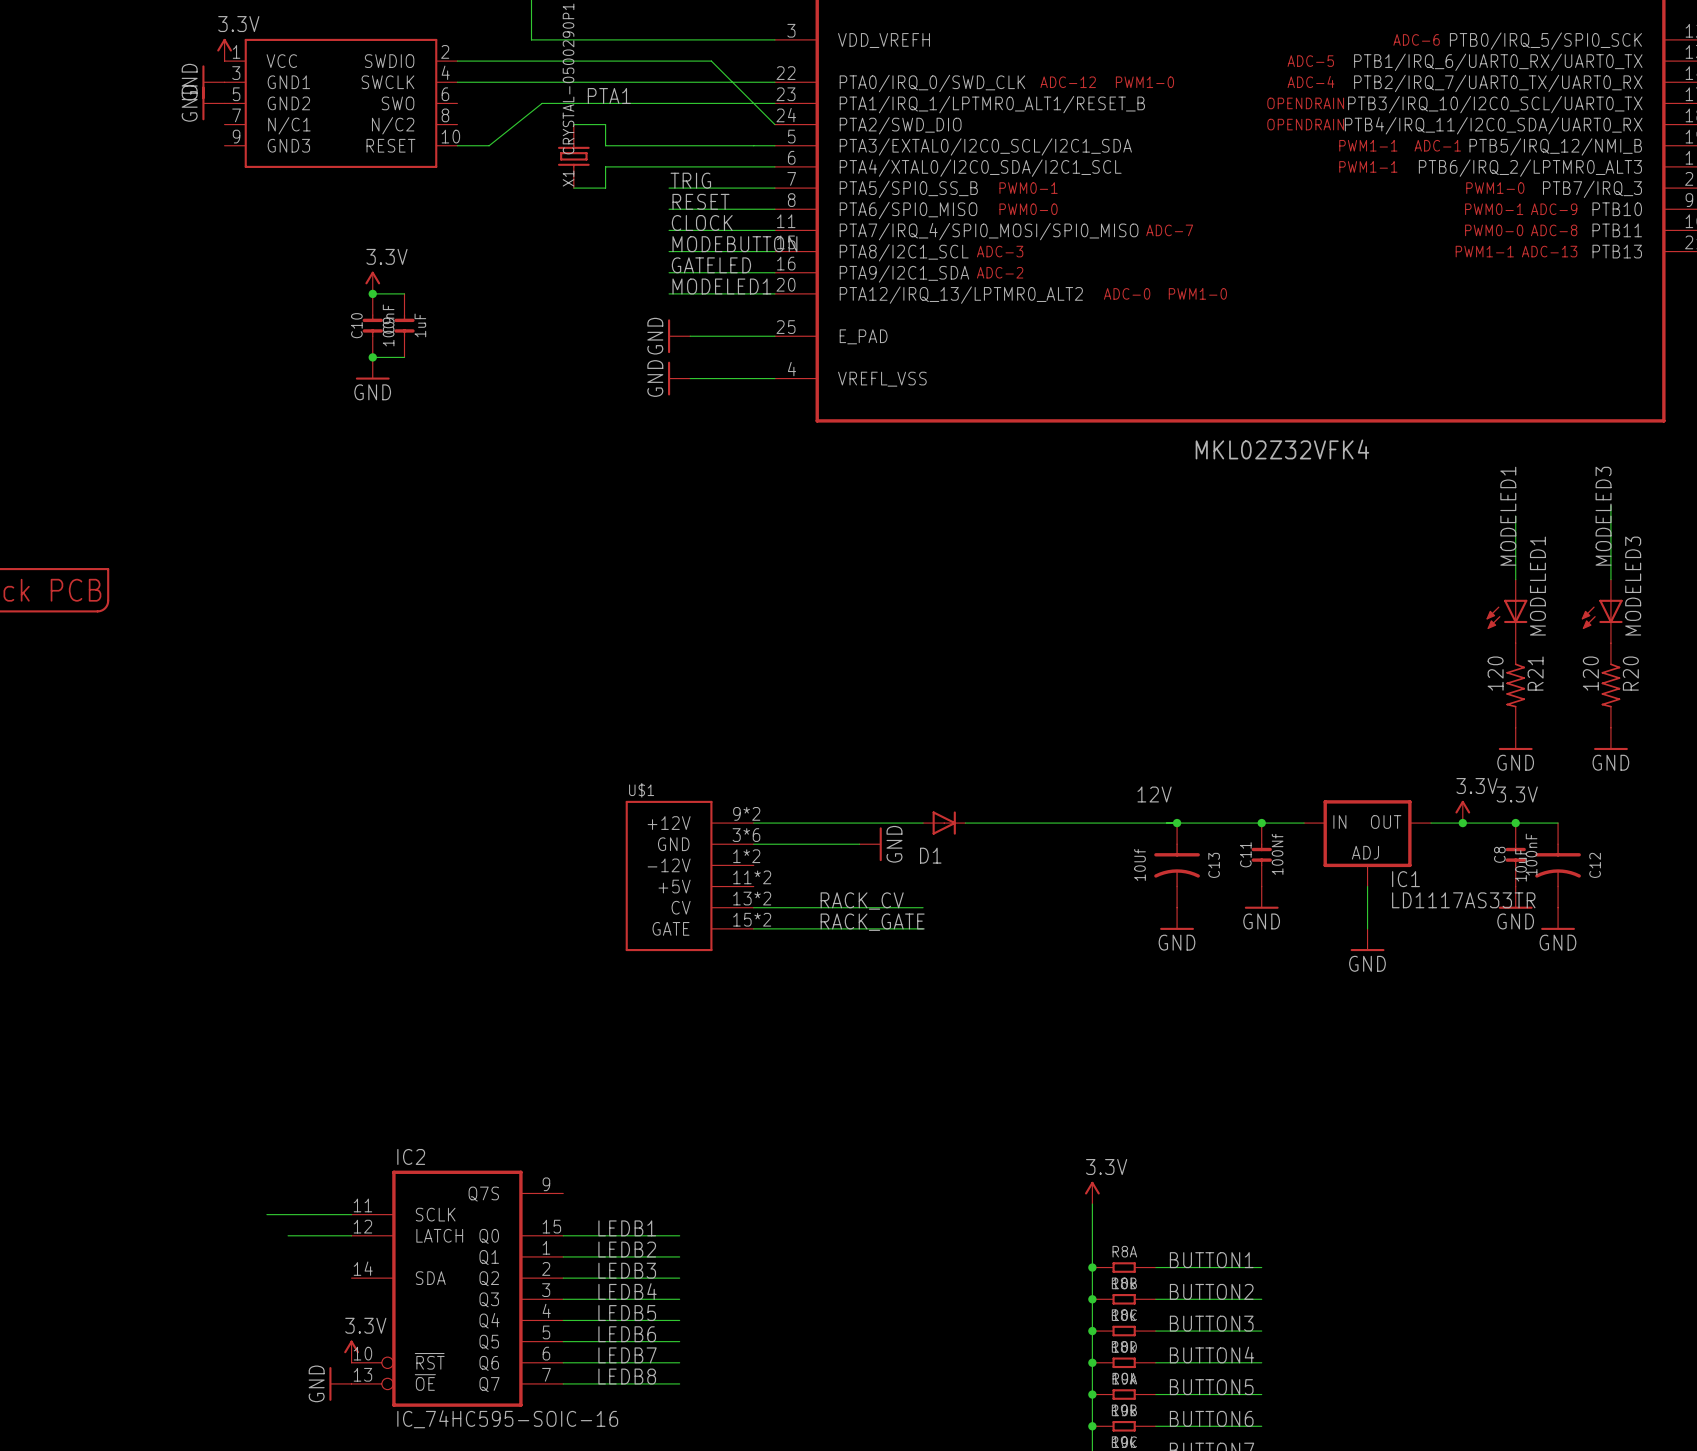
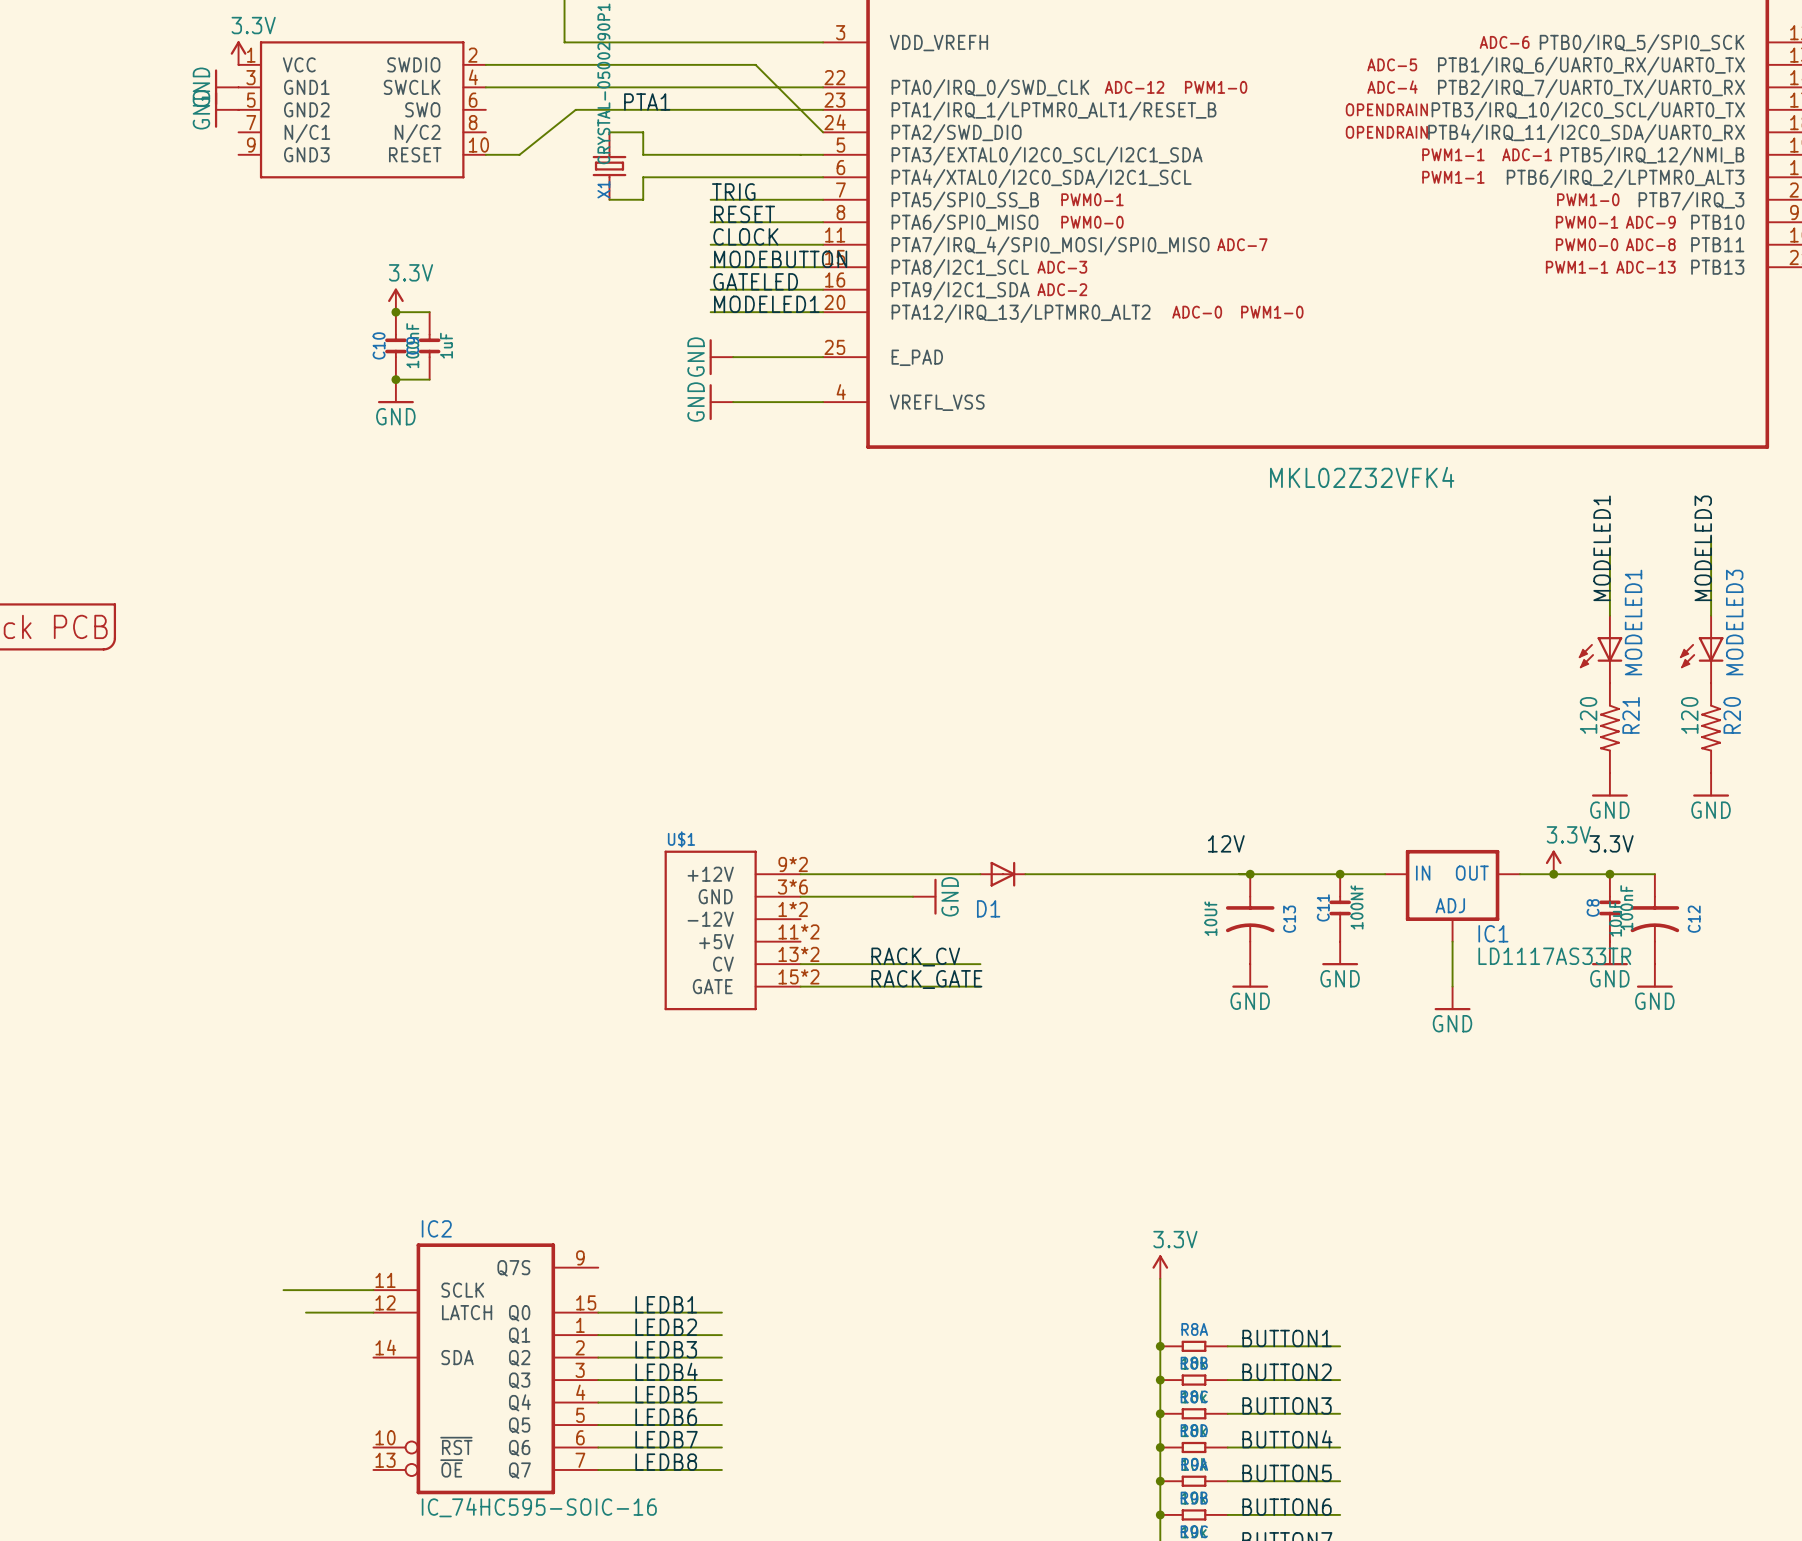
power symbol: 3.3V (351, 1351) -> none
power symbol: GND (340, 1383) -> none

